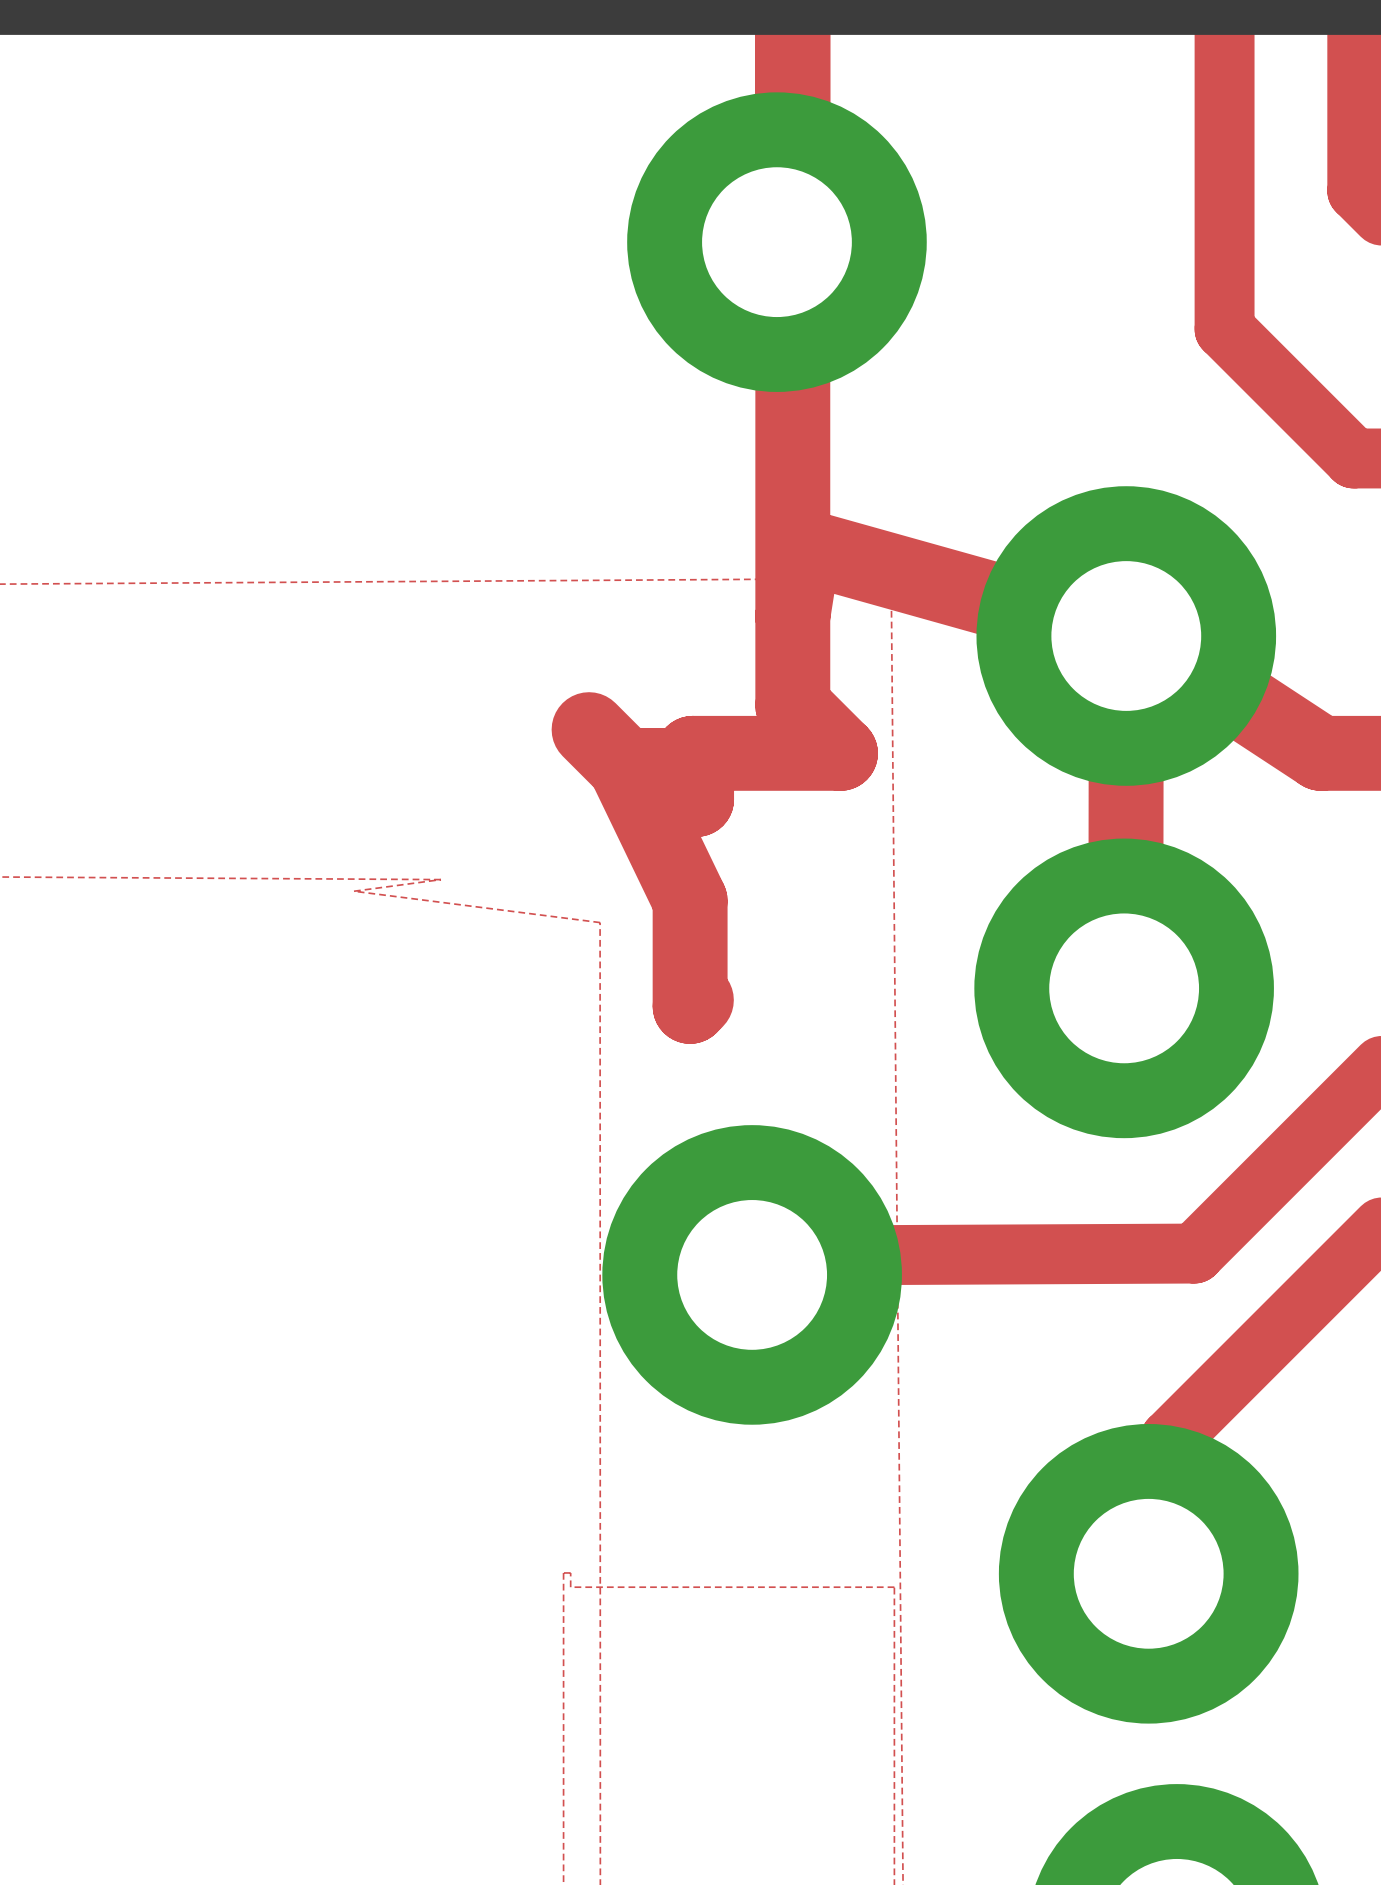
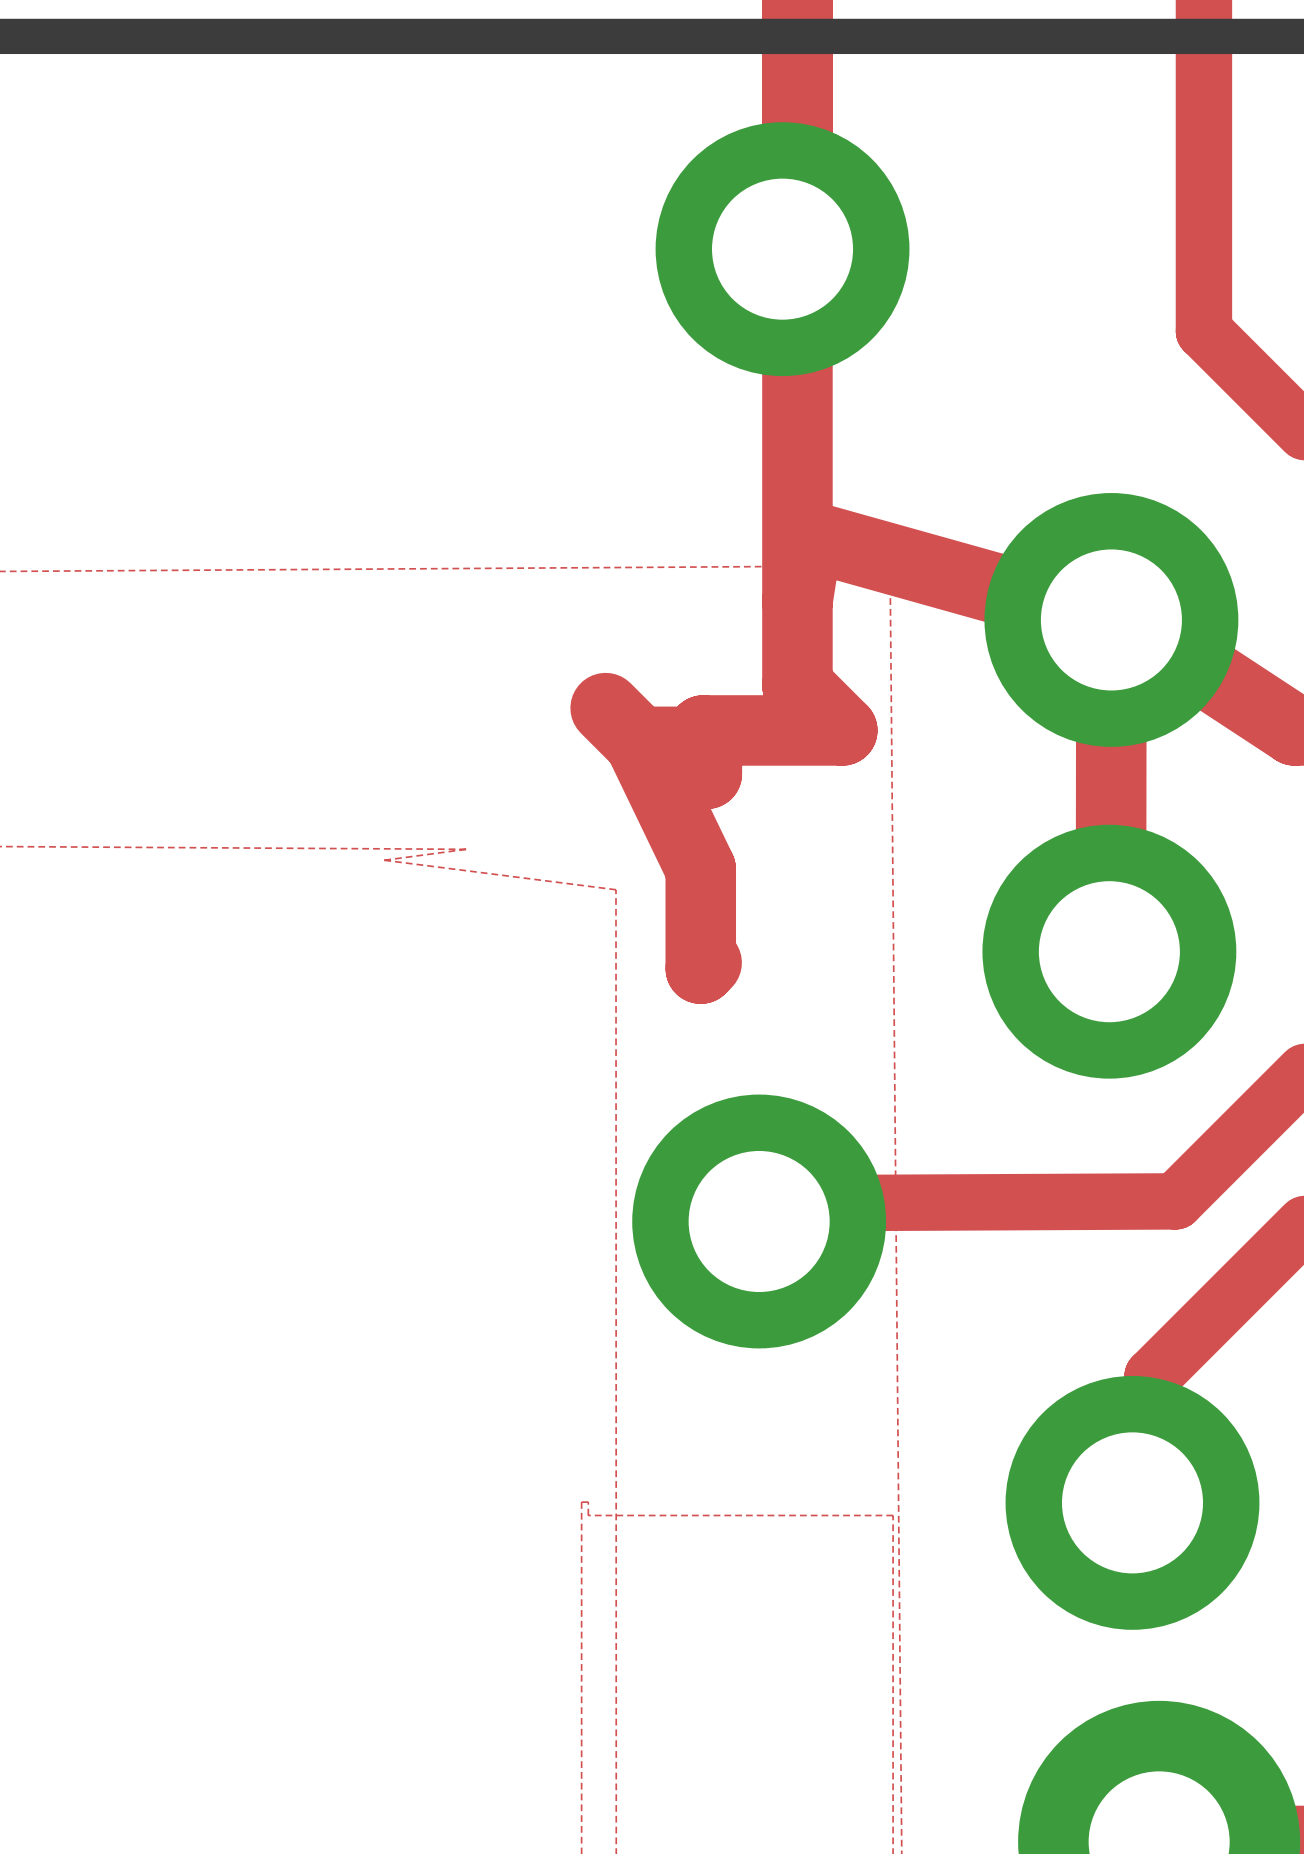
via size: [627, 92, 927, 392] -> [655, 122, 910, 377]
via size: [976, 486, 1277, 786] -> [984, 493, 1239, 747]
via size: [974, 838, 1274, 1139] -> [982, 824, 1237, 1079]
via size: [602, 1125, 902, 1425] -> [632, 1094, 887, 1349]
via size: [998, 1424, 1299, 1724] -> [1005, 1375, 1260, 1630]

